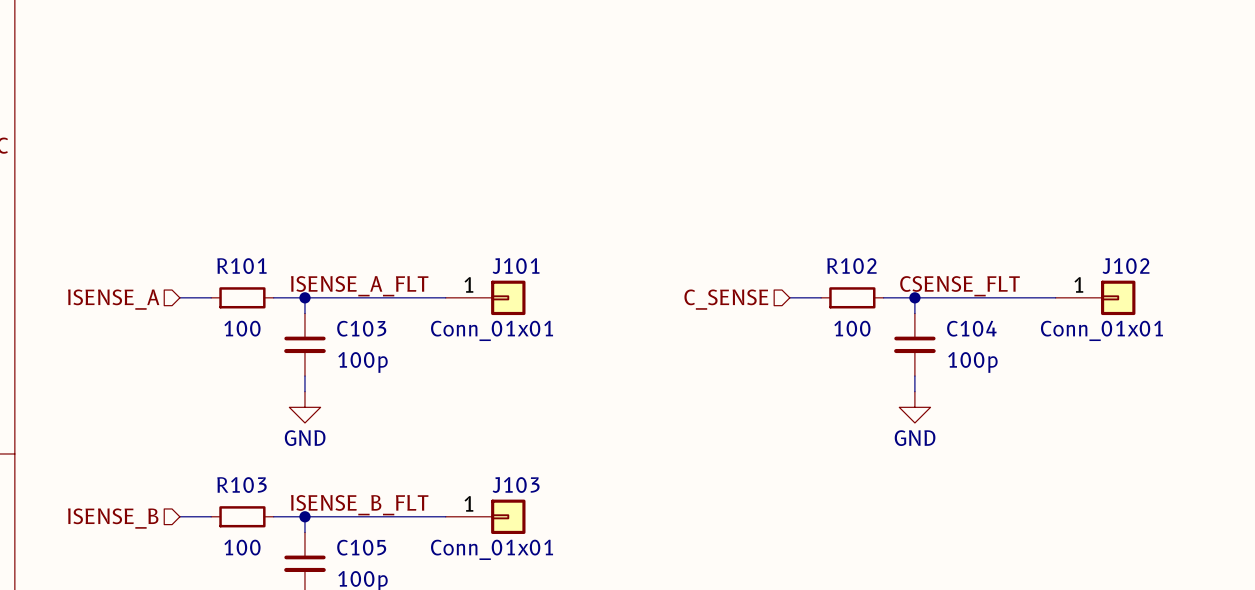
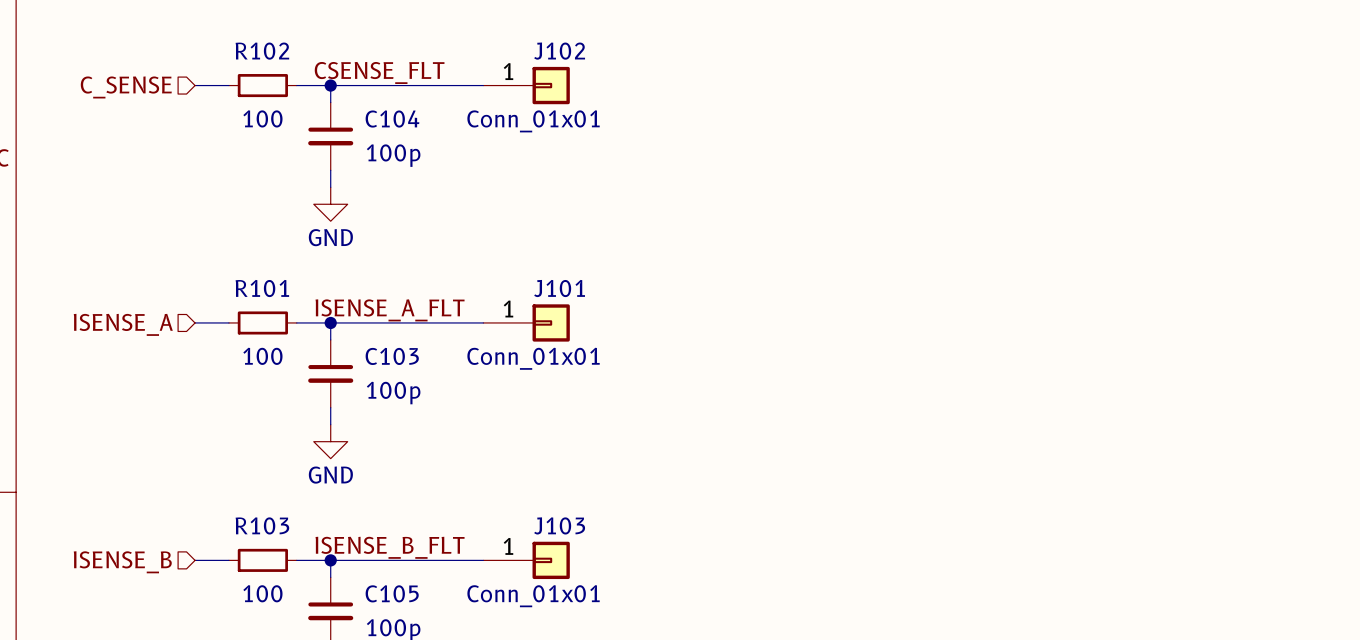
label: none -> CSENSE_FLT (379, 72)
wire: none -> (195, 85) (228, 85)
wire: none -> (296, 85) (483, 85)
wire: none -> (330, 85) (330, 102)
junction: none -> (330, 85)
hierarchical label: none -> C_SENSE (126, 87)
wire: none -> (330, 170) (330, 187)
power symbol: none -> GND (330, 204)
label: CSENSE_FLT (960, 286) -> none
wire: (789, 297) (821, 297) -> none
R102 position: (852, 297) -> (262, 85)
wire: (883, 297) (1055, 297) -> none
wire: (914, 297) (914, 313) -> none
junction: (914, 297) -> none
J102 position: (1095, 297) -> (526, 85)
hierarchical label: C_SENSE (726, 299) -> none
C104 position: (914, 344) -> (330, 136)
wire: (914, 376) (914, 391) -> none
power symbol: GND (914, 407) -> none

